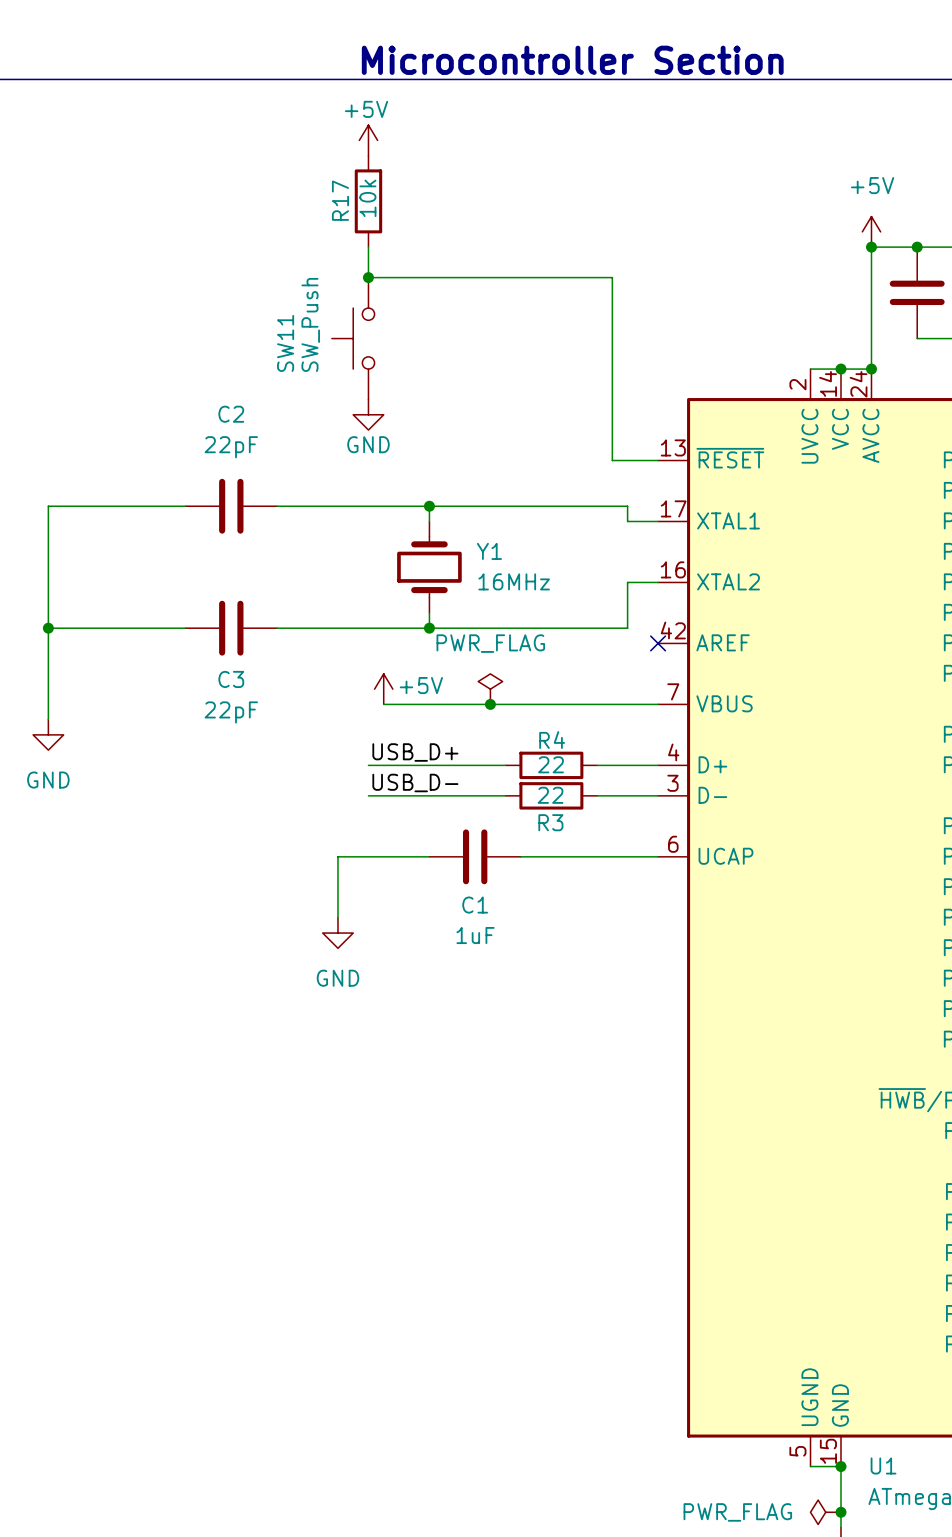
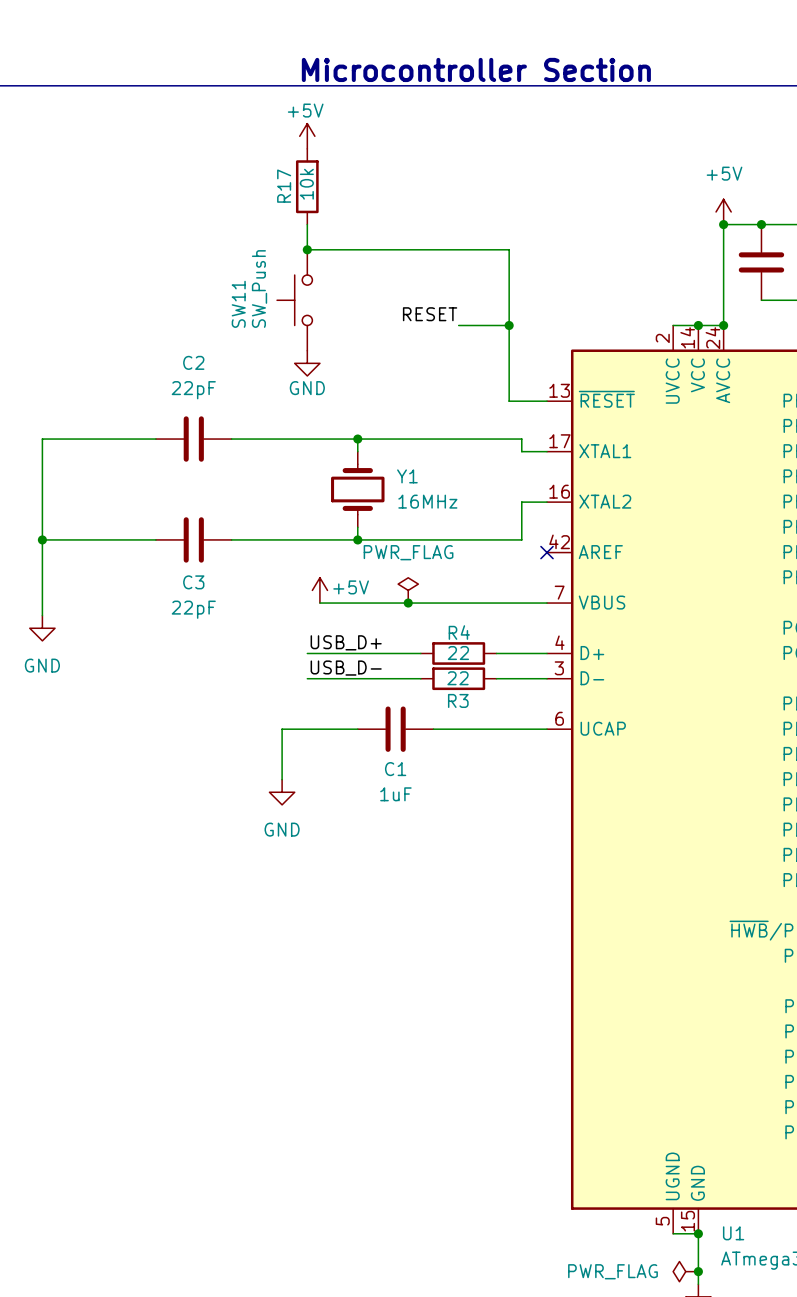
label: none -> RESET (430, 314)
wire: none -> (458, 325) (509, 325)
junction: none -> (509, 325)

